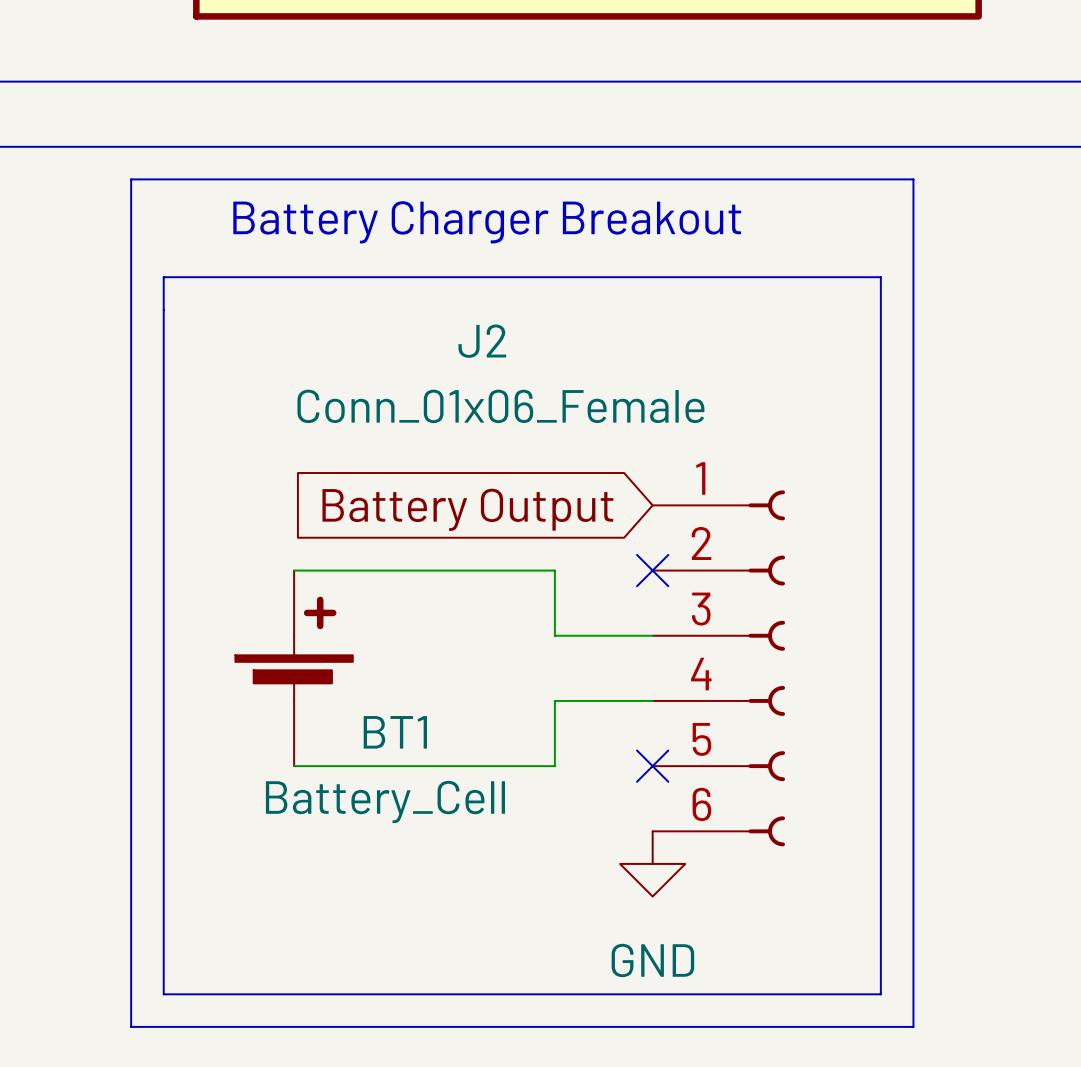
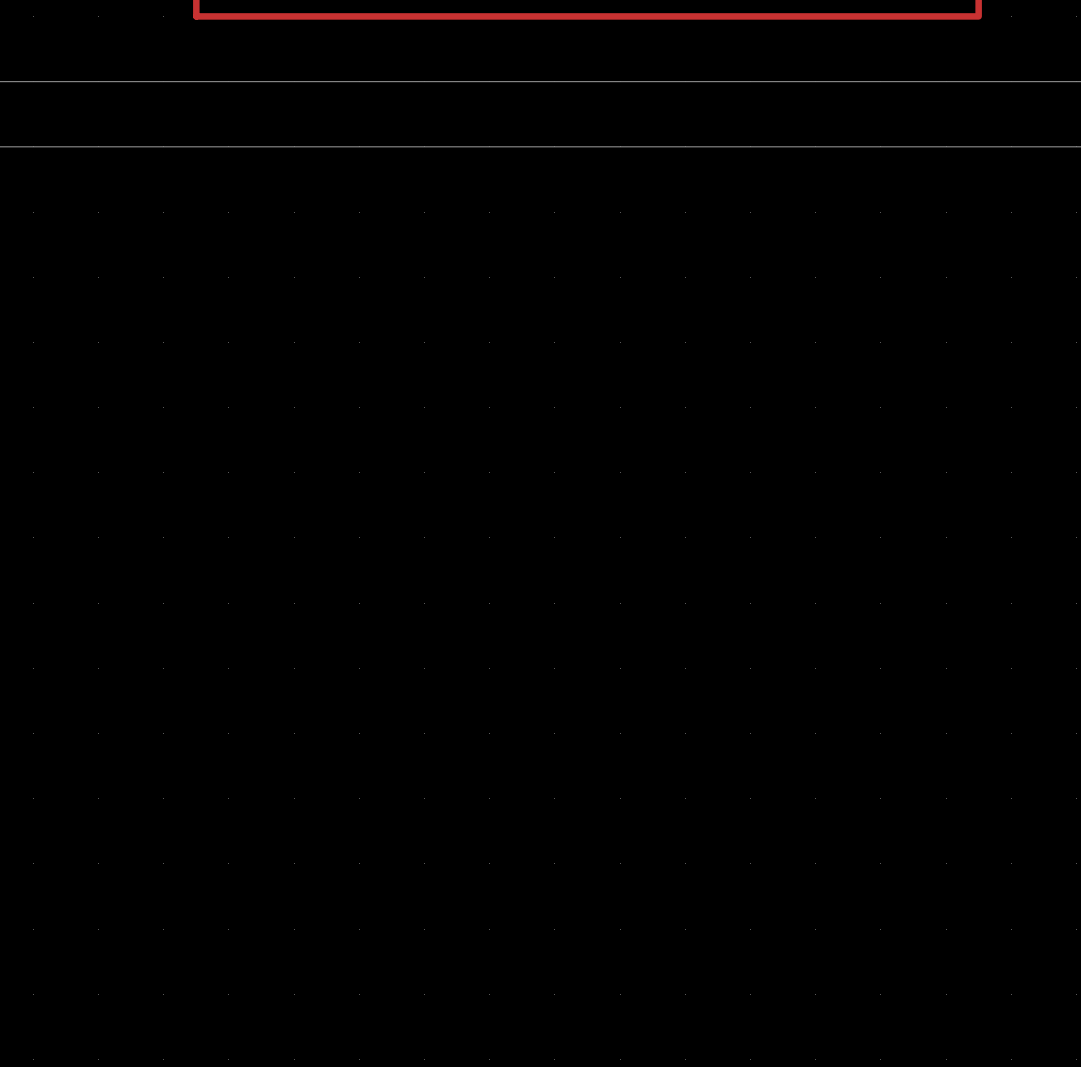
line: (131, 179) (913, 179) (913, 1026) (131, 1026) (131, 179) -> none
text: Battery Charger Breakout (487, 222) -> none
line: (163, 277) (163, 994) (880, 994) (880, 277) (163, 277) -> none
global label: Battery Output (467, 509) -> none
wire: (294, 570) (554, 570) (554, 635) (652, 635) -> none
no-connect mark: (652, 570) -> none
BT1: Battery_Cell (294, 668) -> none
J2: Conn_01x06_Female (718, 668) -> none
wire: (652, 700) (554, 700) (554, 766) (294, 766) -> none
no-connect mark: (652, 766) -> none
power symbol: GND (652, 863) -> none

